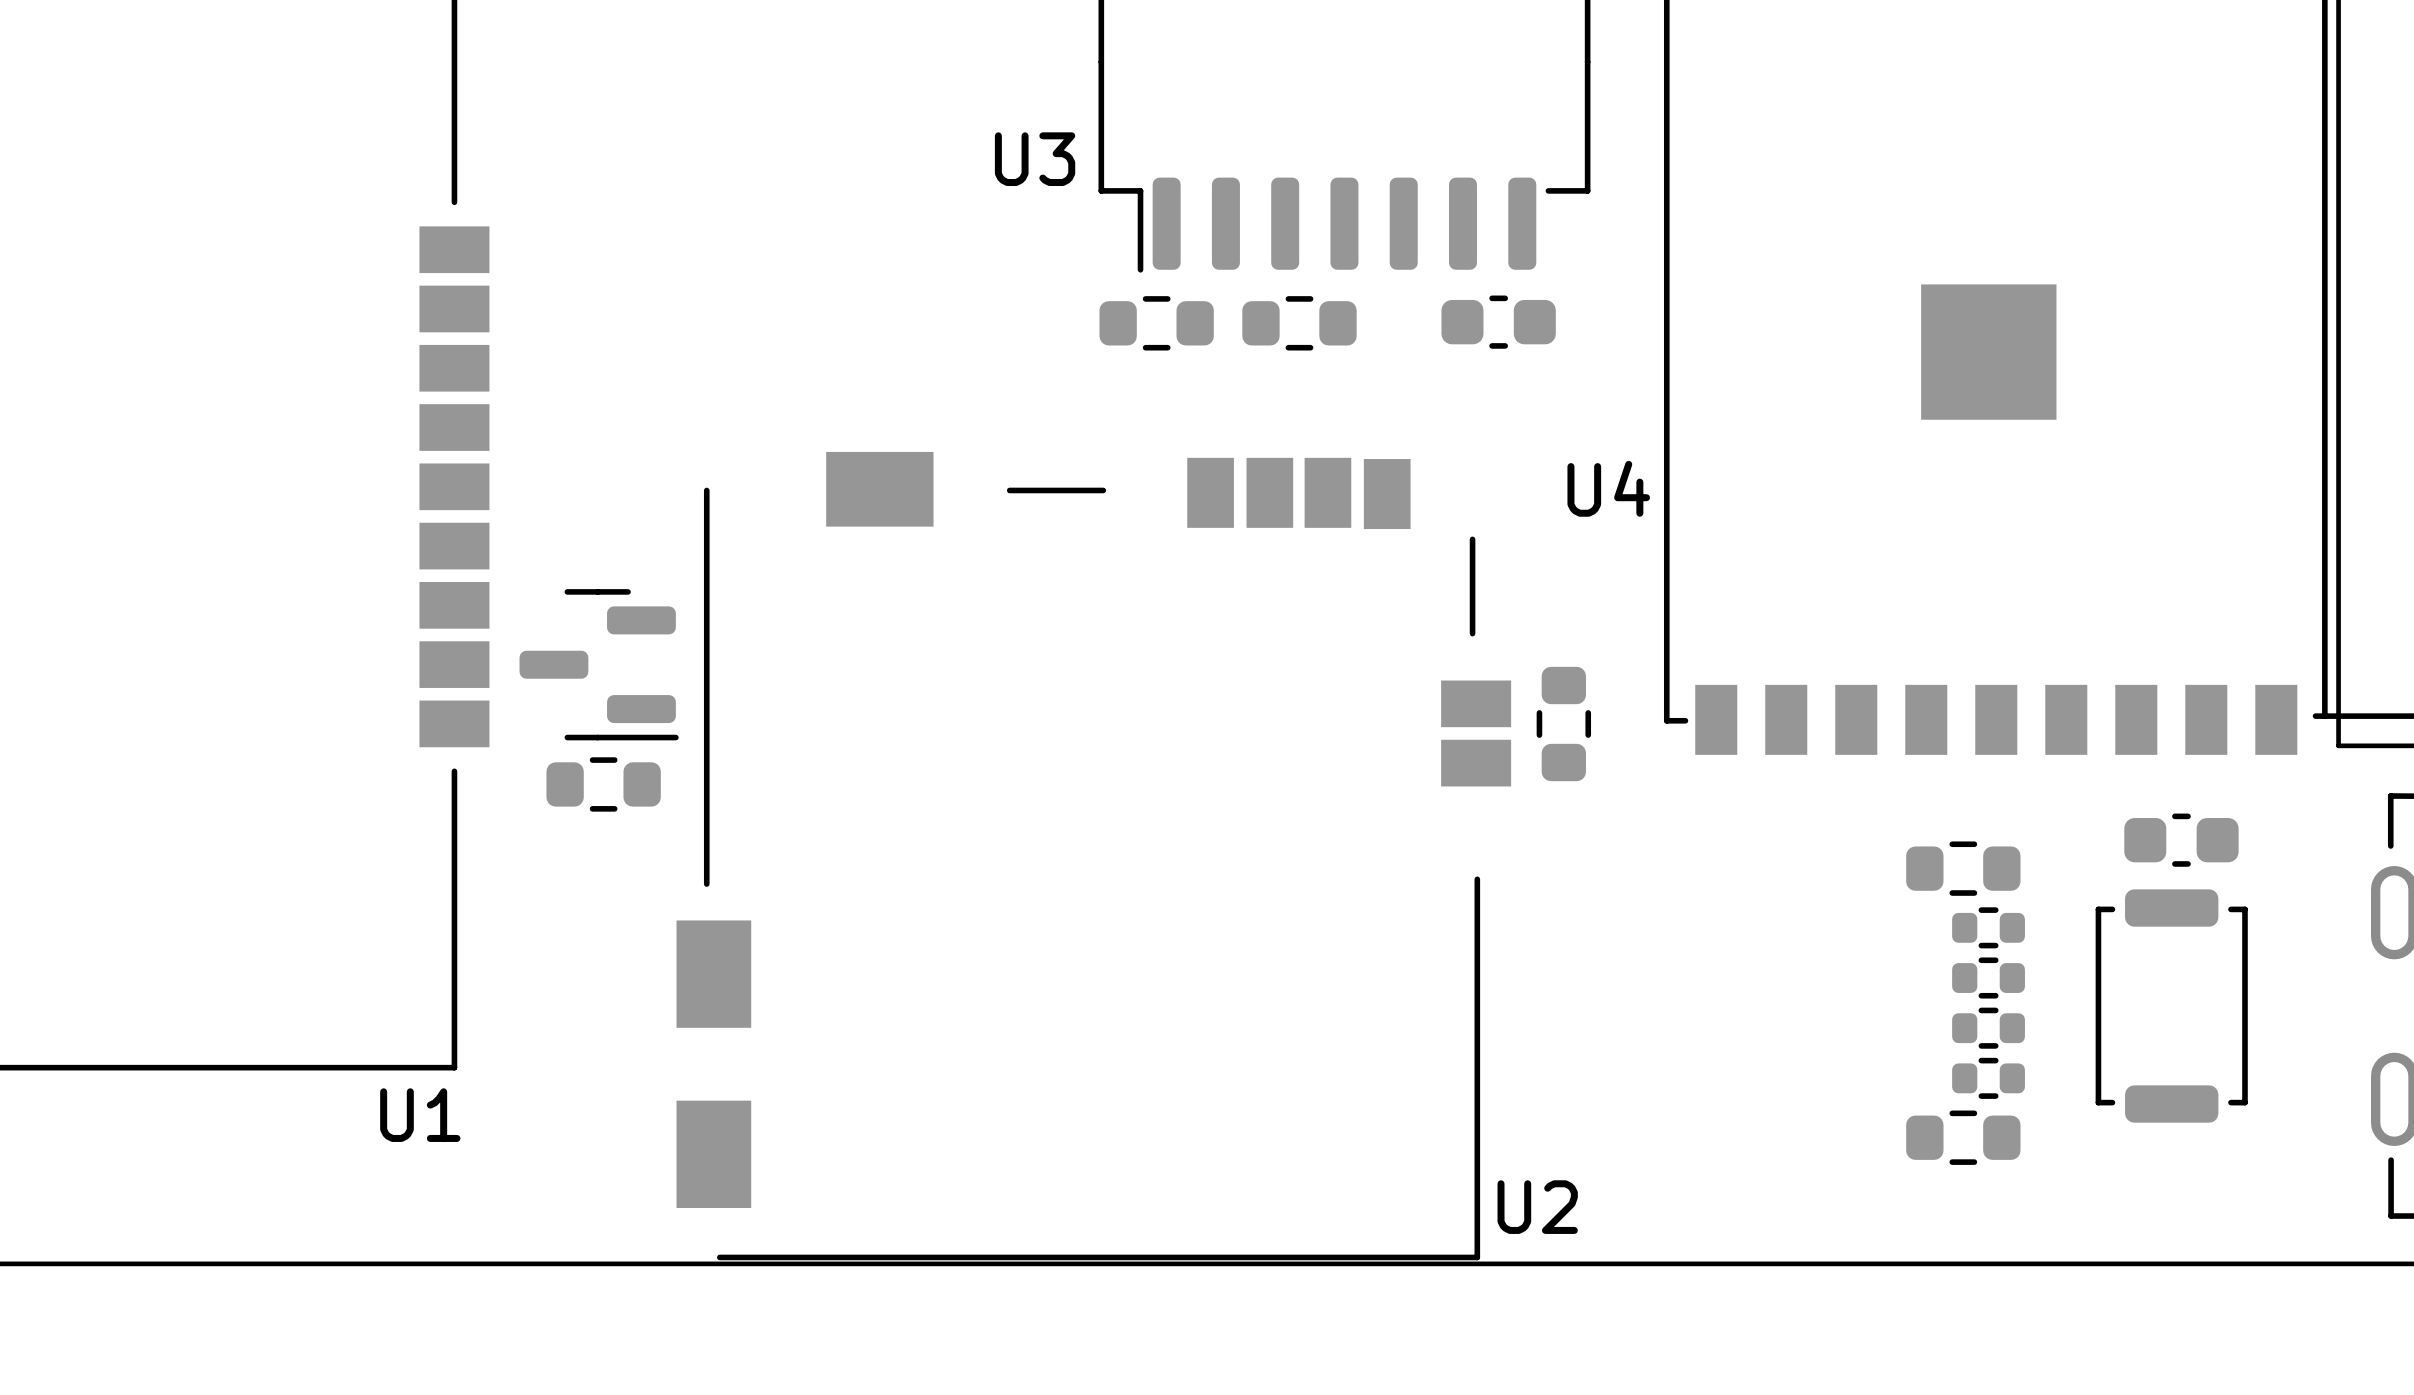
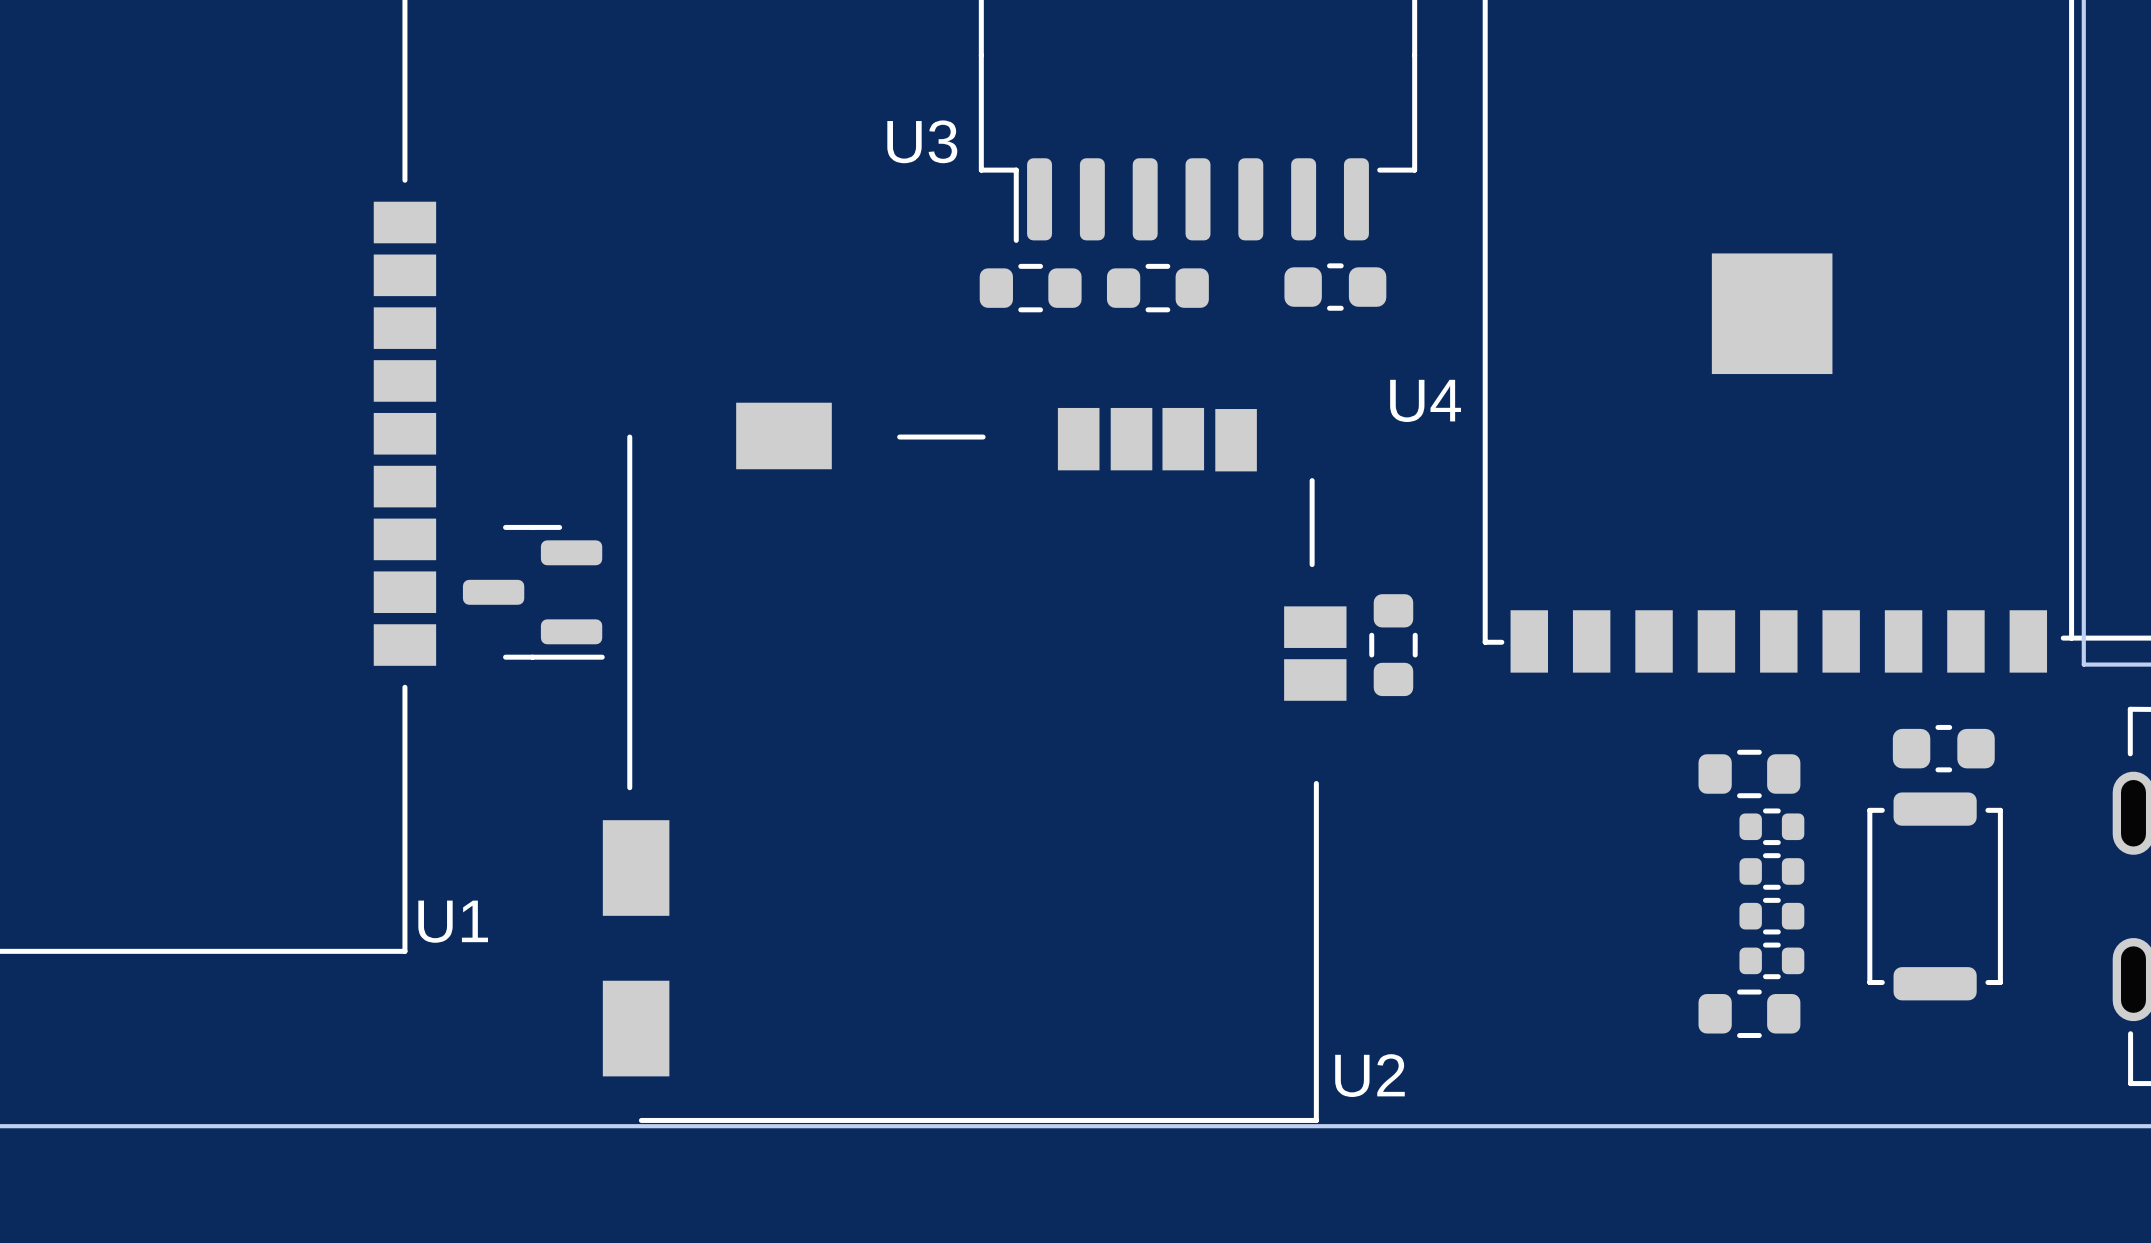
U4 name position: U4 (1608, 488) -> U4 (1425, 400)
part: (603, 784) -> none
U1 name position: U1 (420, 1115) -> U1 (453, 921)

